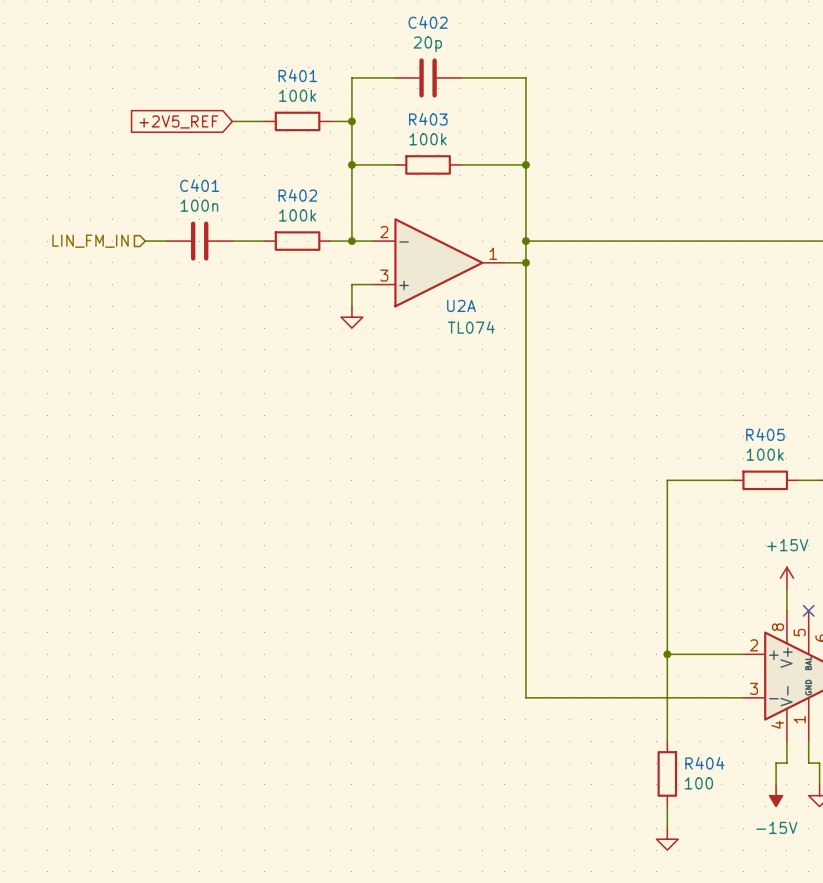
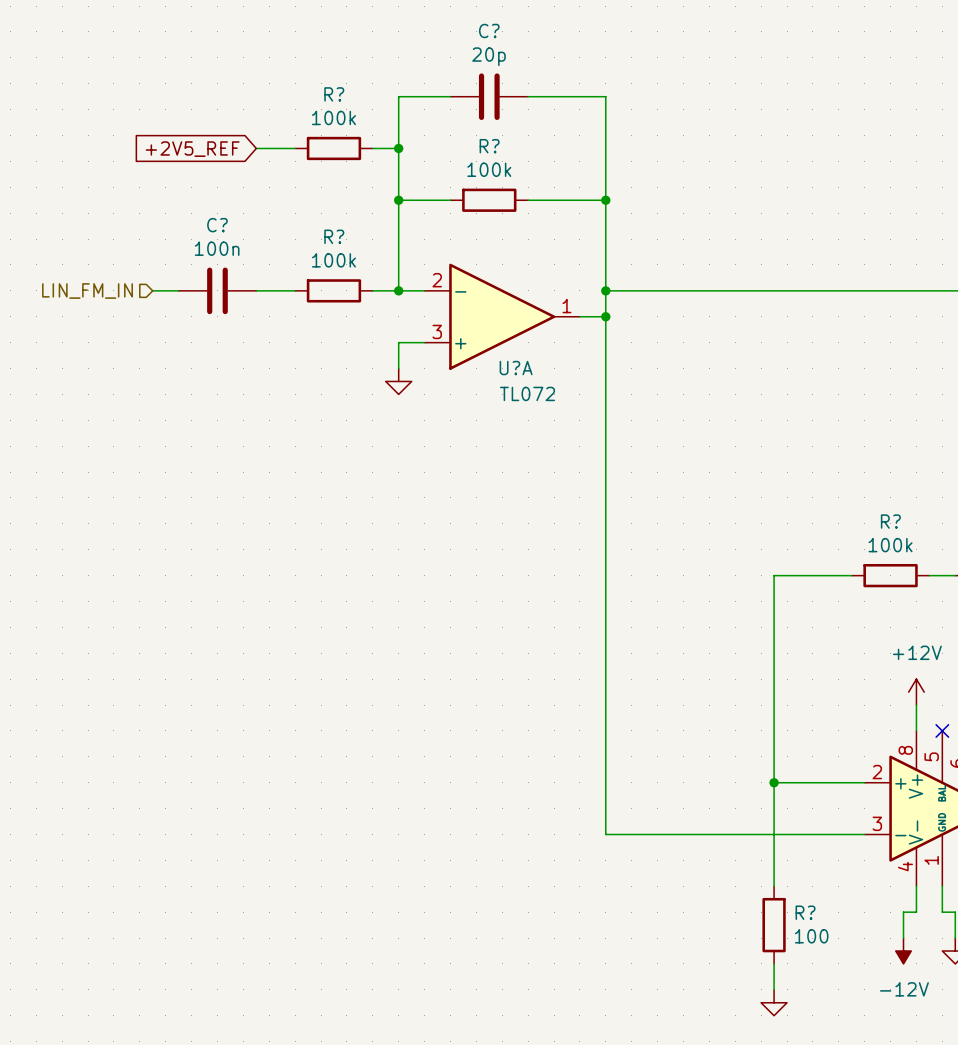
C402 name: C402 (428, 22) -> C? (489, 30)
R401 name: R401 (297, 75) -> R? (334, 94)
R403 name: R403 (428, 119) -> R? (489, 146)
C401 name: C401 (199, 185) -> C? (217, 225)
R402 name: R402 (297, 195) -> R? (334, 236)
U2A name: U2A (461, 305) -> U?A (516, 368)
U2A value: TL074 (471, 327) -> TL072 (527, 393)
R405 name: R405 (765, 434) -> R? (890, 521)
power symbol: +15V (786, 578) -> +12V (916, 692)
R404 name: R404 (704, 763) -> R? (805, 912)
power symbol: -15V (776, 795) -> -12V (903, 951)

